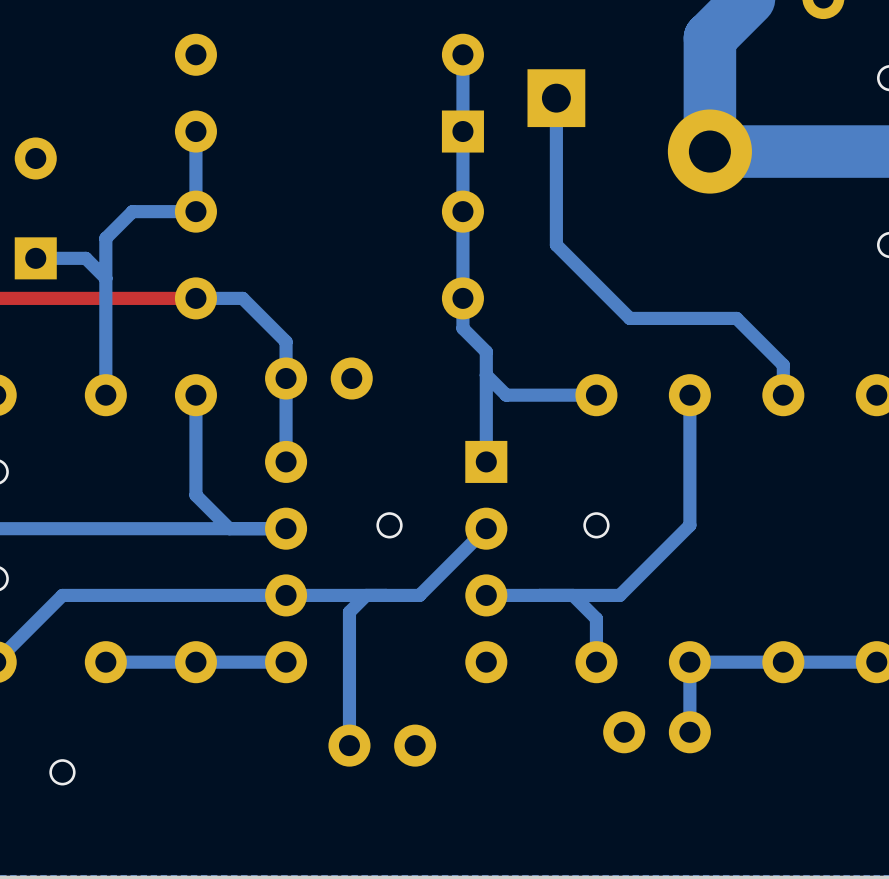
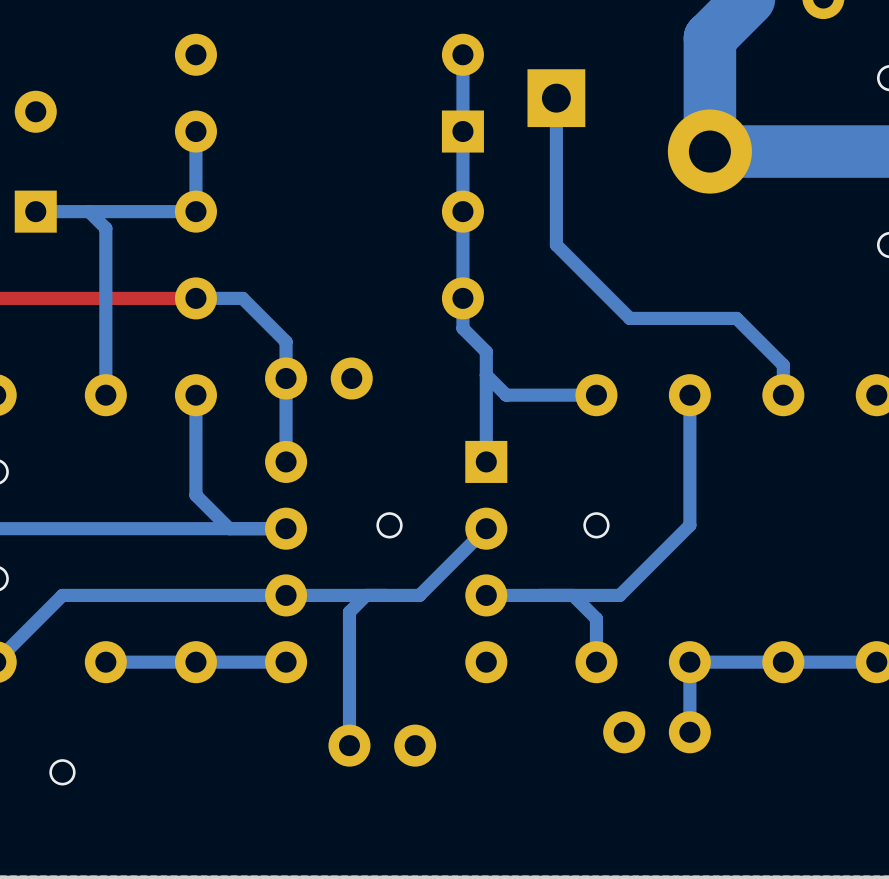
part position: (35, 208) -> (35, 161)
bottom track: (132, 211) (105, 238) -> (89, 211) (105, 228) (105, 238)
bottom track: none -> (132, 211) (35, 211)
bottom track: (35, 258) (85, 258) (105, 278) -> none

